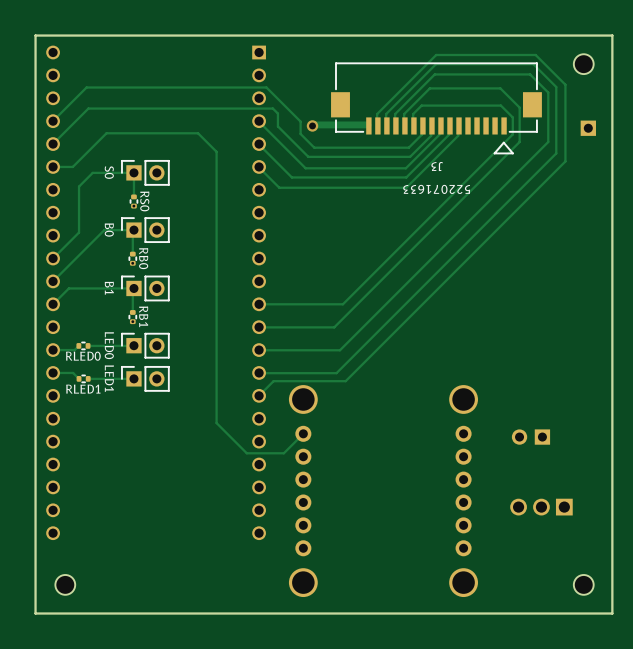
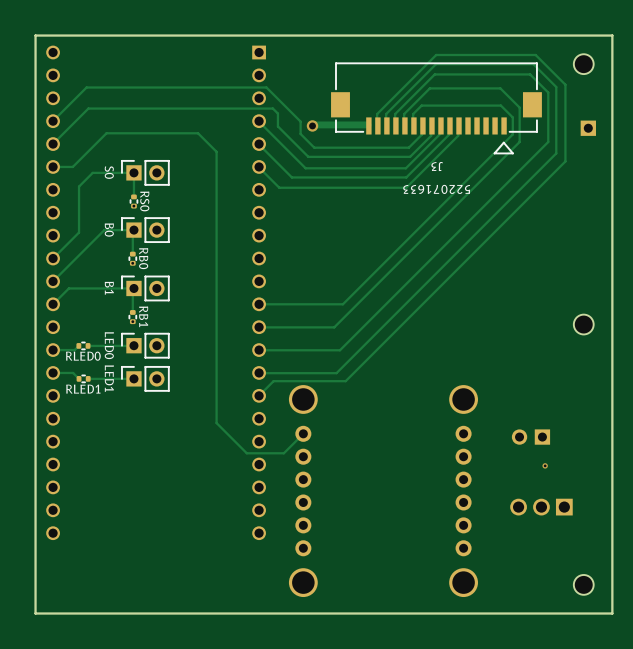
part: none -> (583, 324)
via: none -> (545, 465)
part: (65, 584) -> none

